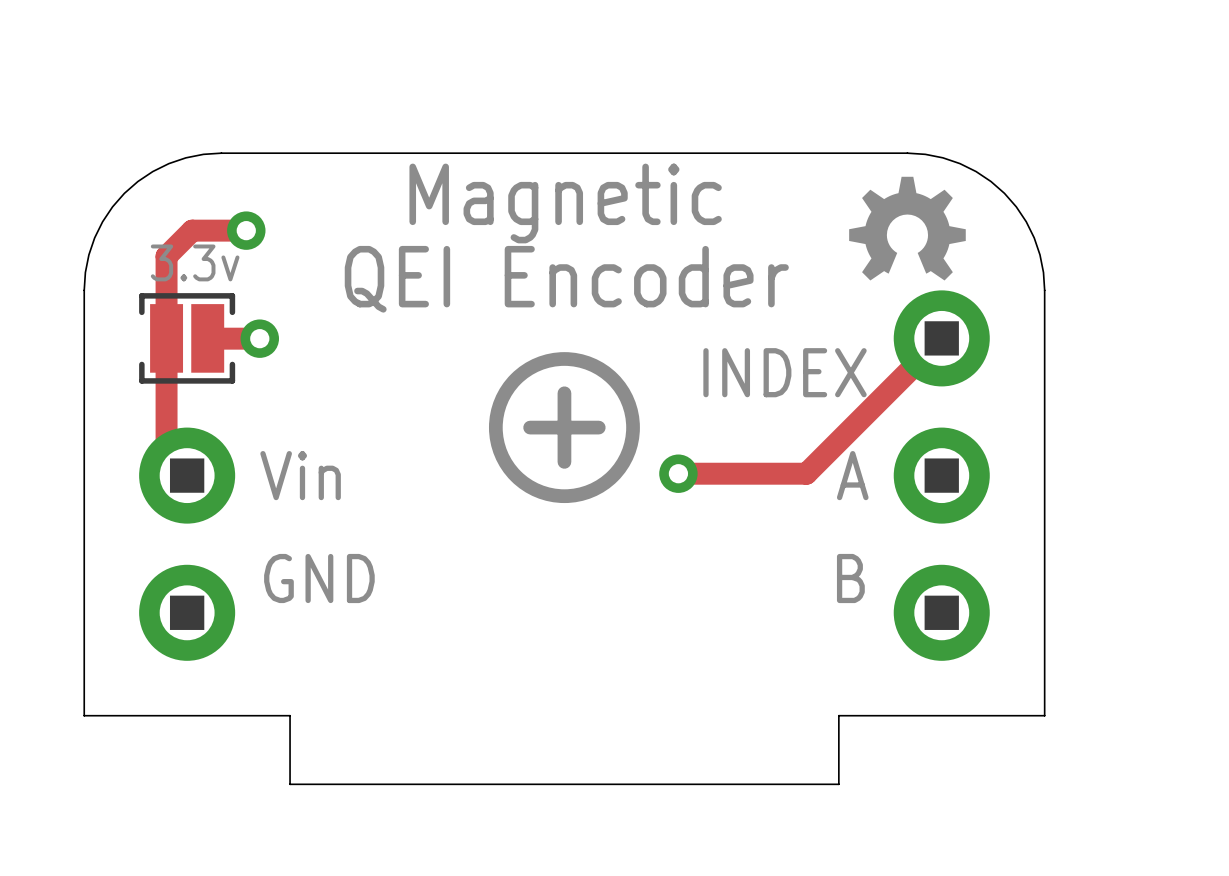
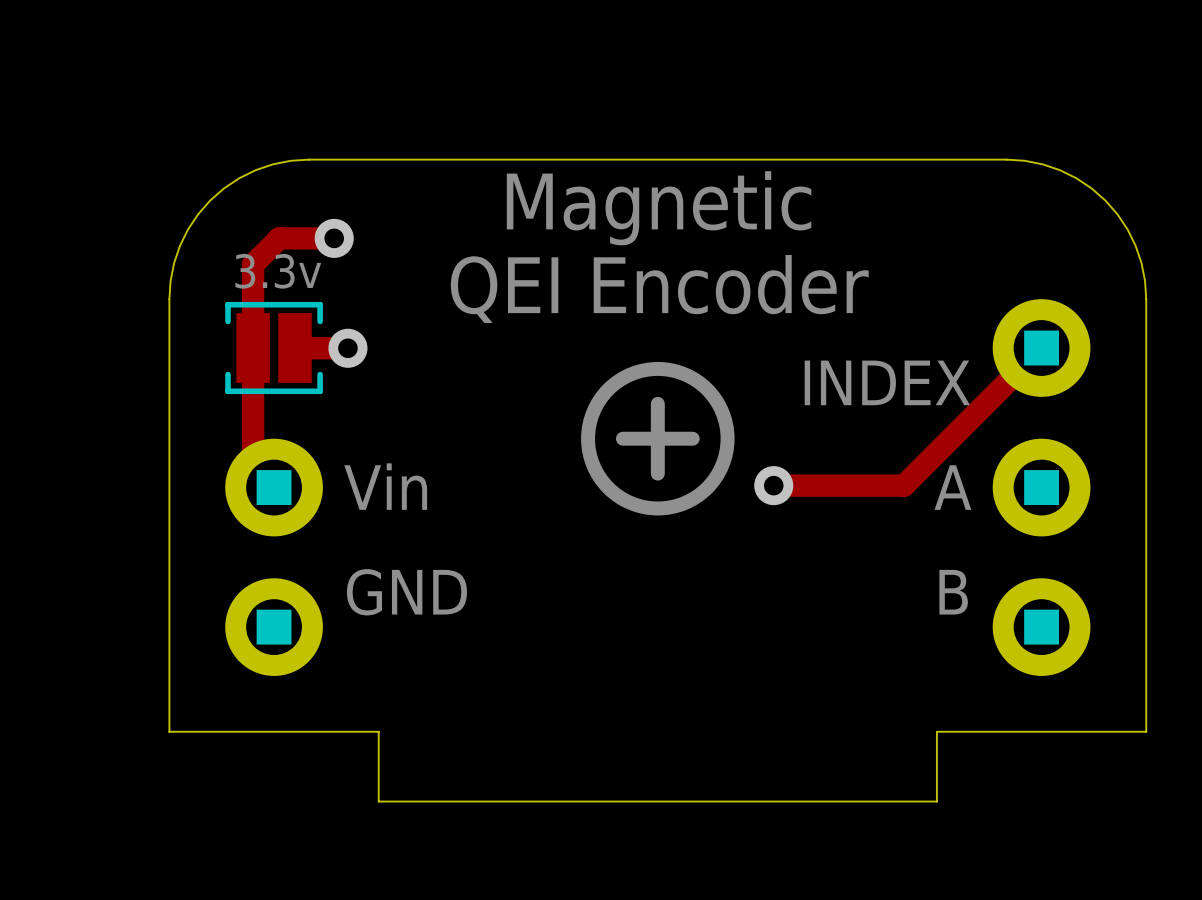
drawing: [849, 176, 966, 281] -> none

